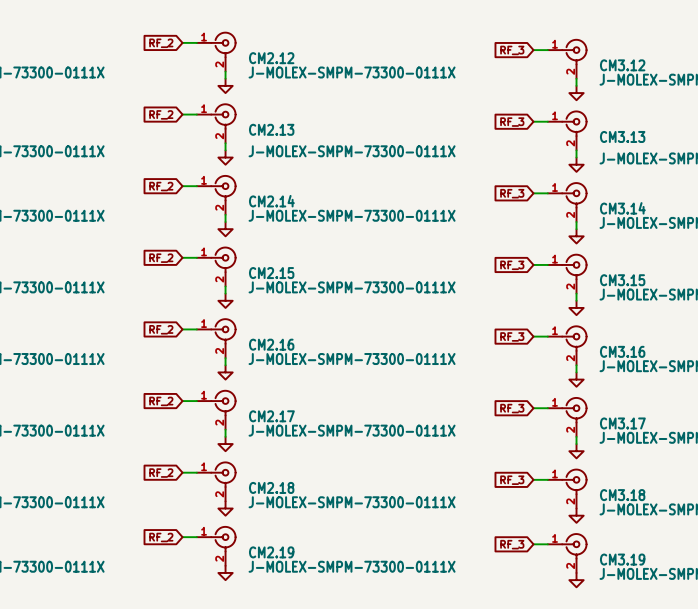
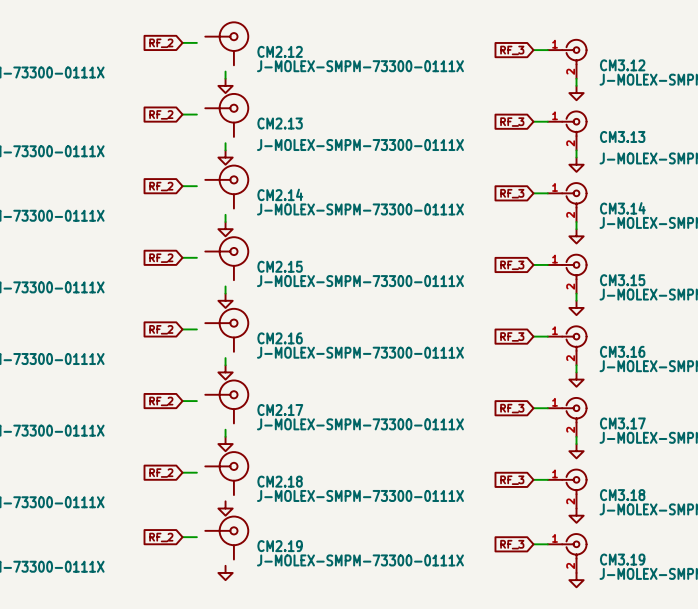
CM2.12 symbol: [196, 31, 237, 72] -> [205, 21, 249, 66]
CM2.13 symbol: [196, 103, 237, 144] -> [205, 93, 249, 137]
CM2.14 symbol: [196, 175, 237, 215] -> [205, 164, 249, 209]
CM2.15 symbol: [196, 246, 237, 287] -> [205, 236, 249, 281]
CM2.16 symbol: [196, 318, 237, 359] -> [205, 308, 249, 352]
CM2.17 symbol: [196, 390, 237, 430] -> [205, 379, 249, 424]
CM2.18 symbol: [196, 461, 237, 502] -> [205, 451, 249, 496]
CM2.19 symbol: [196, 526, 237, 566] -> [205, 515, 249, 560]

